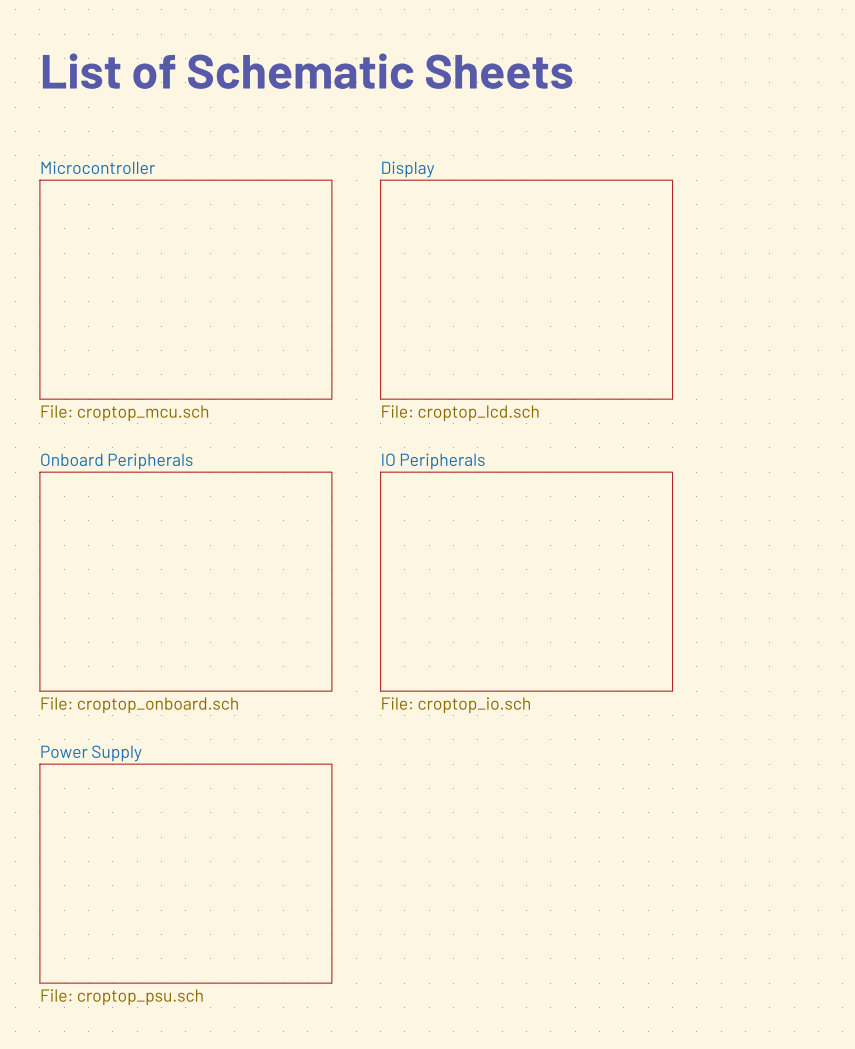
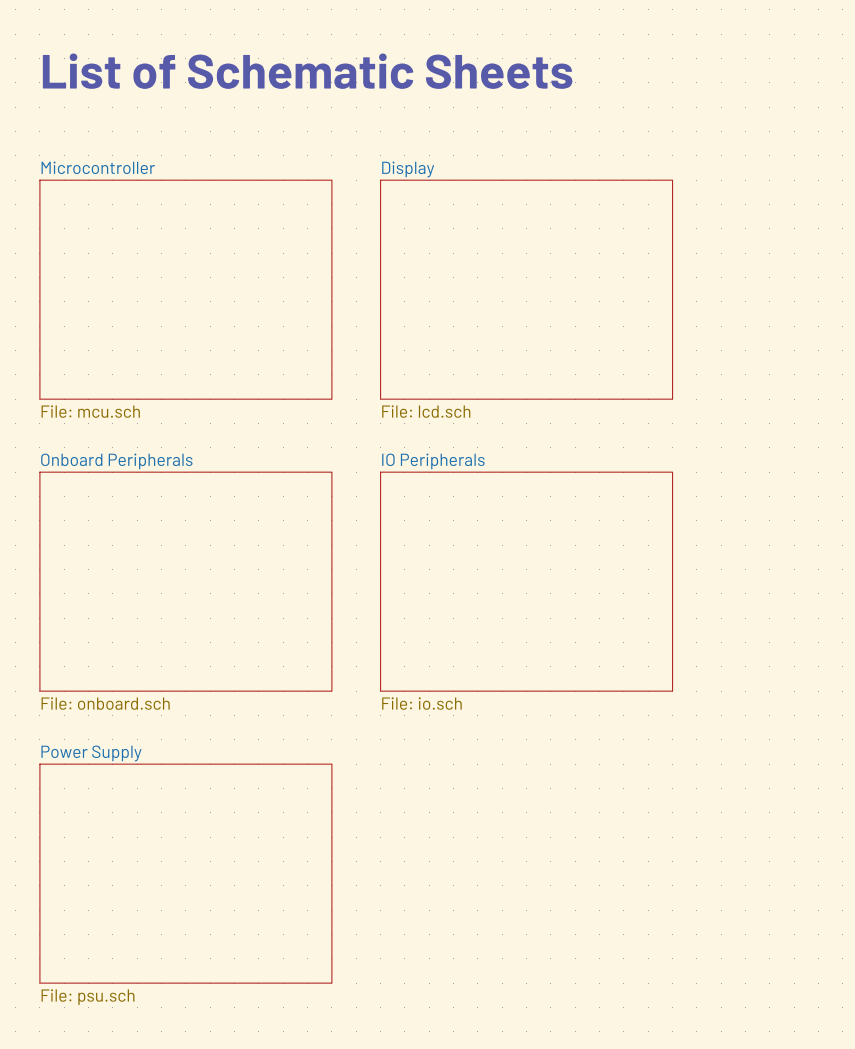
sheet Microcontroller value: File: croptop_mcu.sch (124, 413) -> File: mcu.sch (90, 411)
sheet Display value: File: croptop_lcd.sch (460, 413) -> File: lcd.sch (426, 411)
sheet Onboard Peripherals value: File: croptop_onboard.sch (139, 705) -> File: onboard.sch (105, 703)
sheet IO Peripherals value: File: croptop_io.sch (456, 705) -> File: io.sch (421, 703)
sheet Power Supply value: File: croptop_psu.sch (122, 997) -> File: psu.sch (87, 997)

